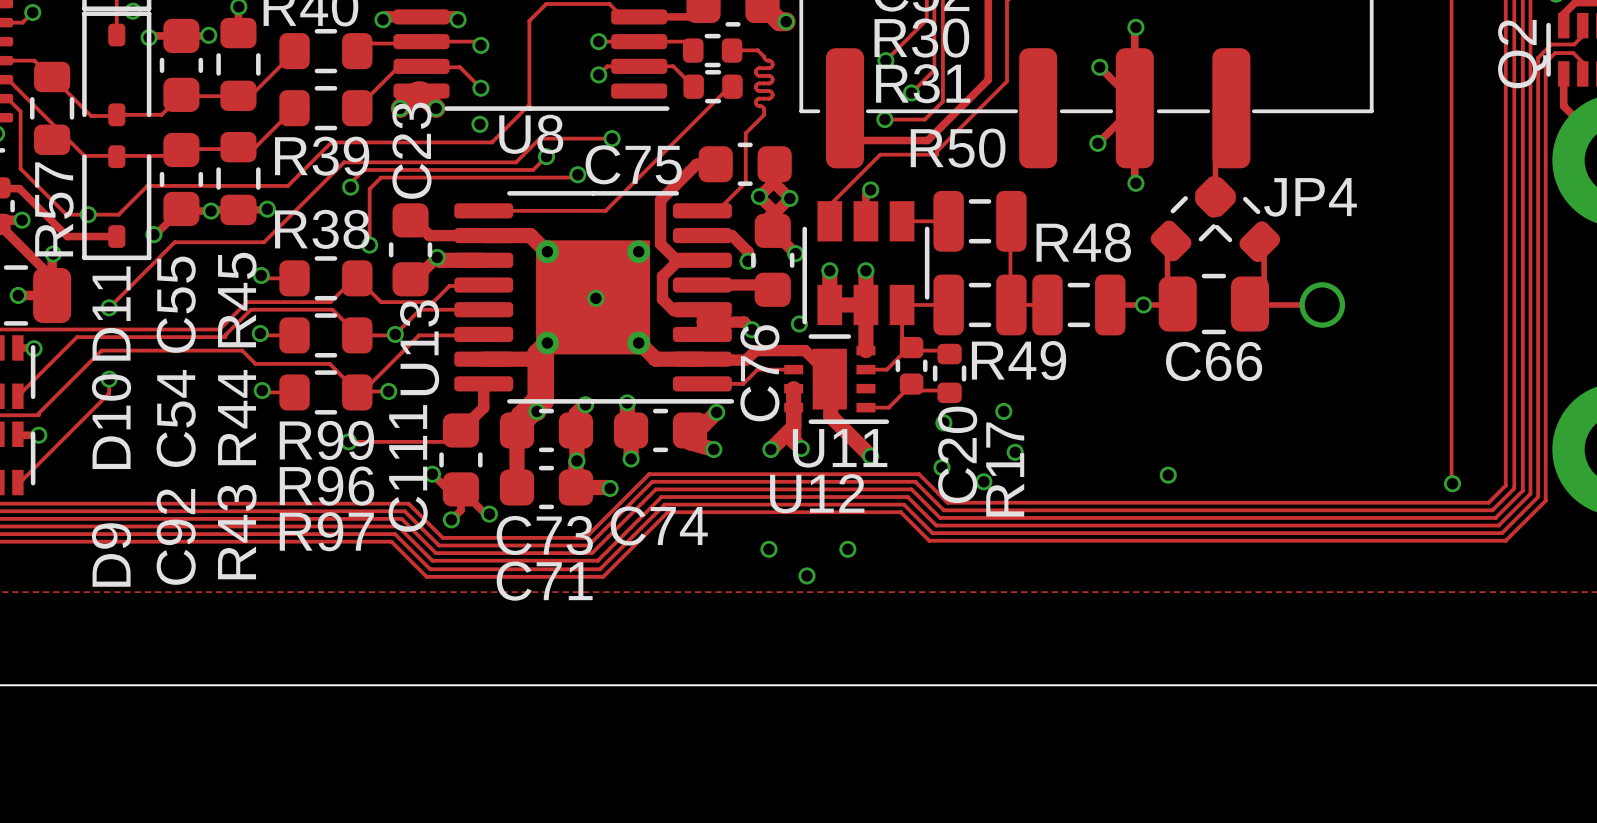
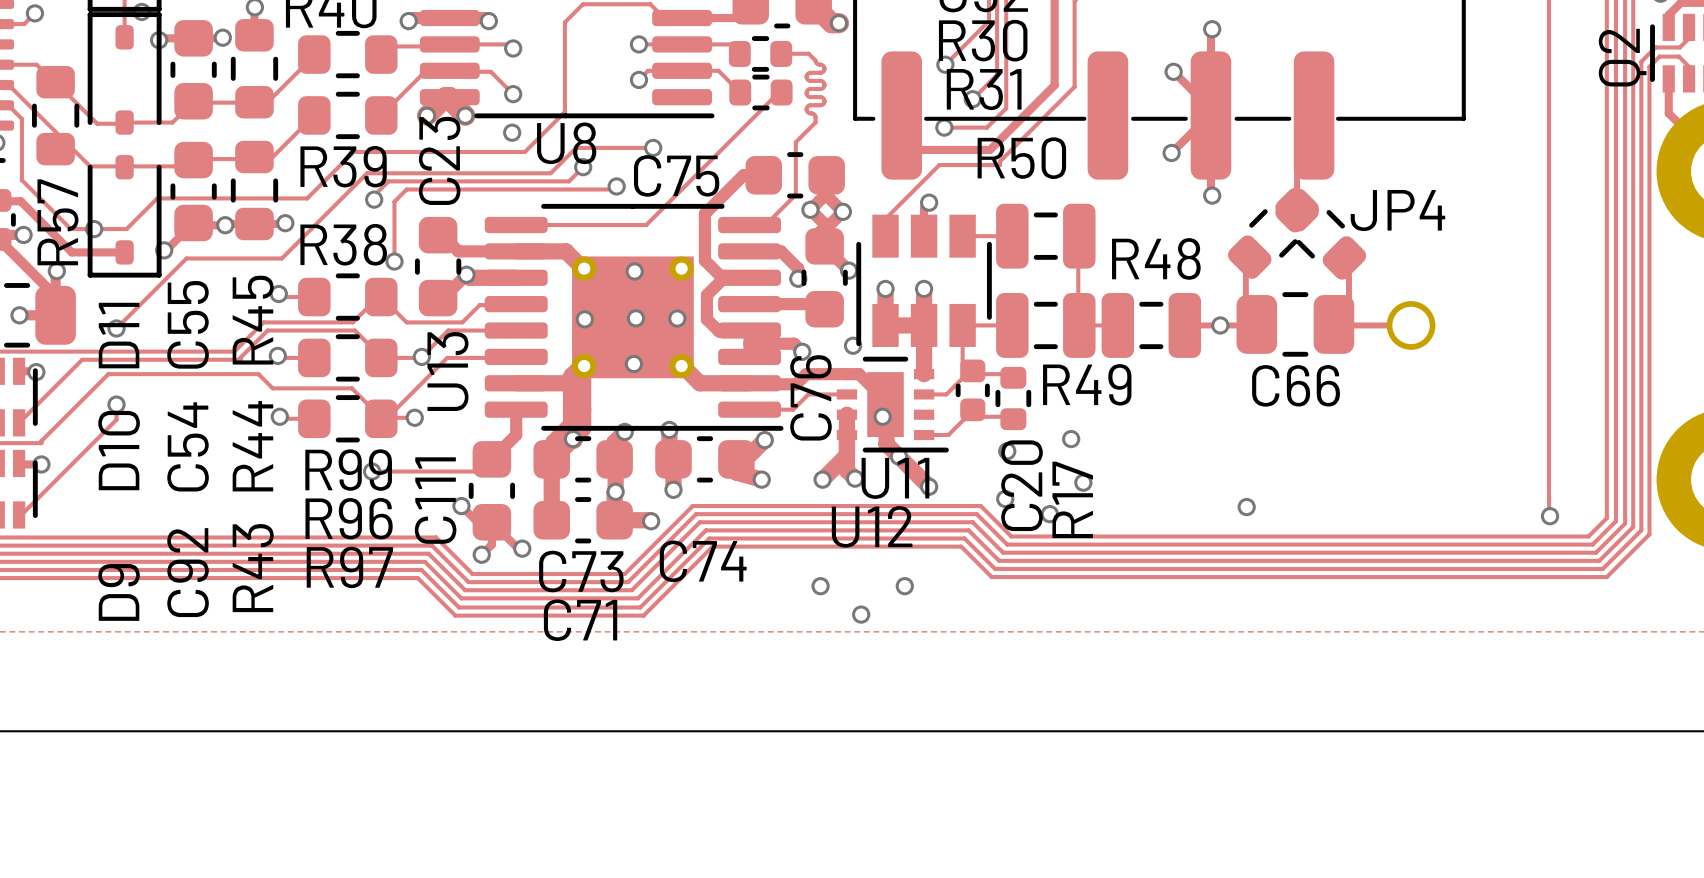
via: none -> (634, 271)
via: none -> (677, 318)
via: none -> (584, 319)
via: none -> (633, 364)
via: none -> (882, 416)
via: none -> (898, 456)

